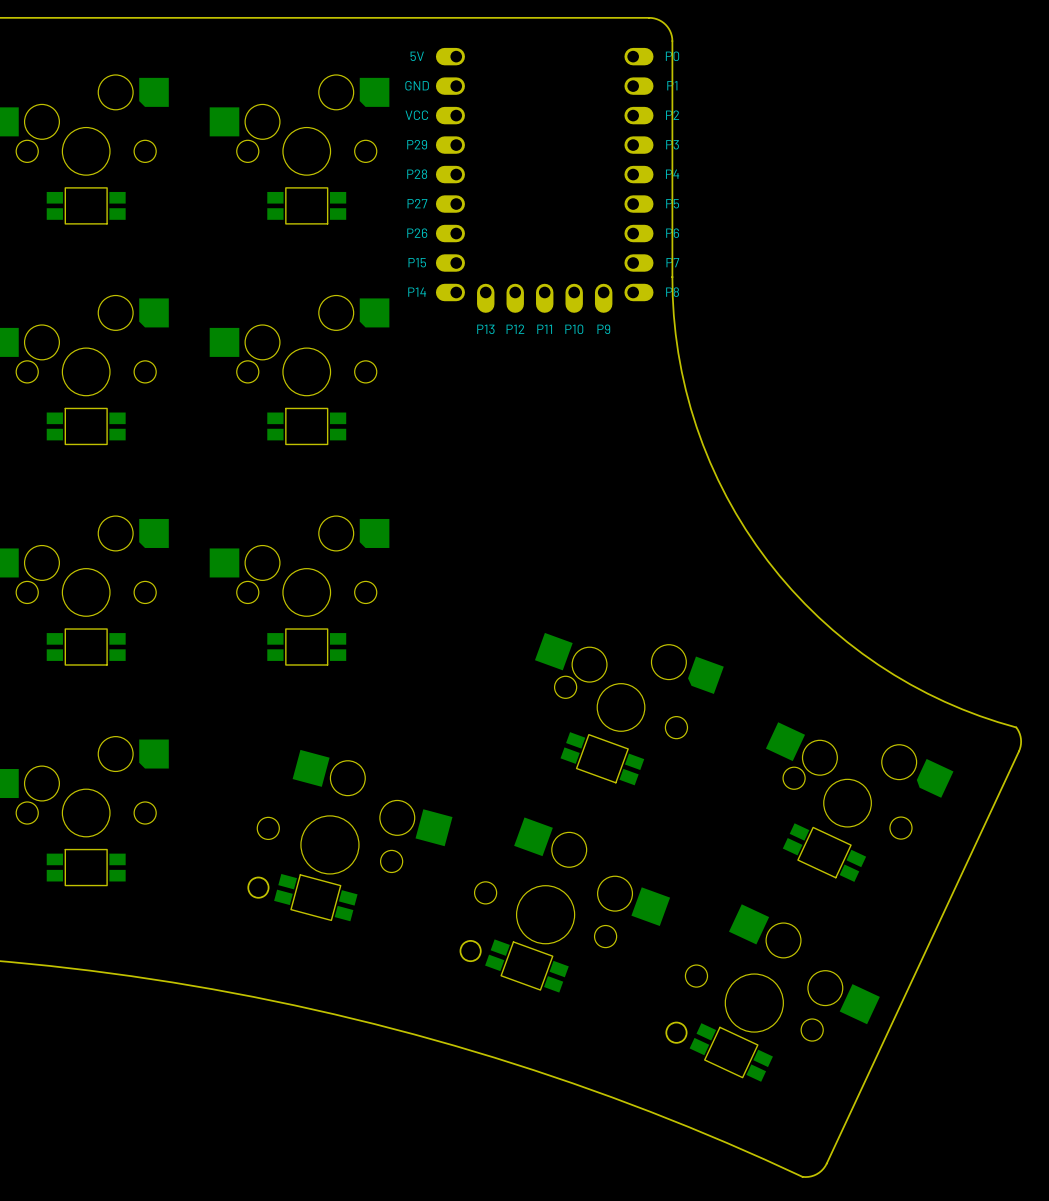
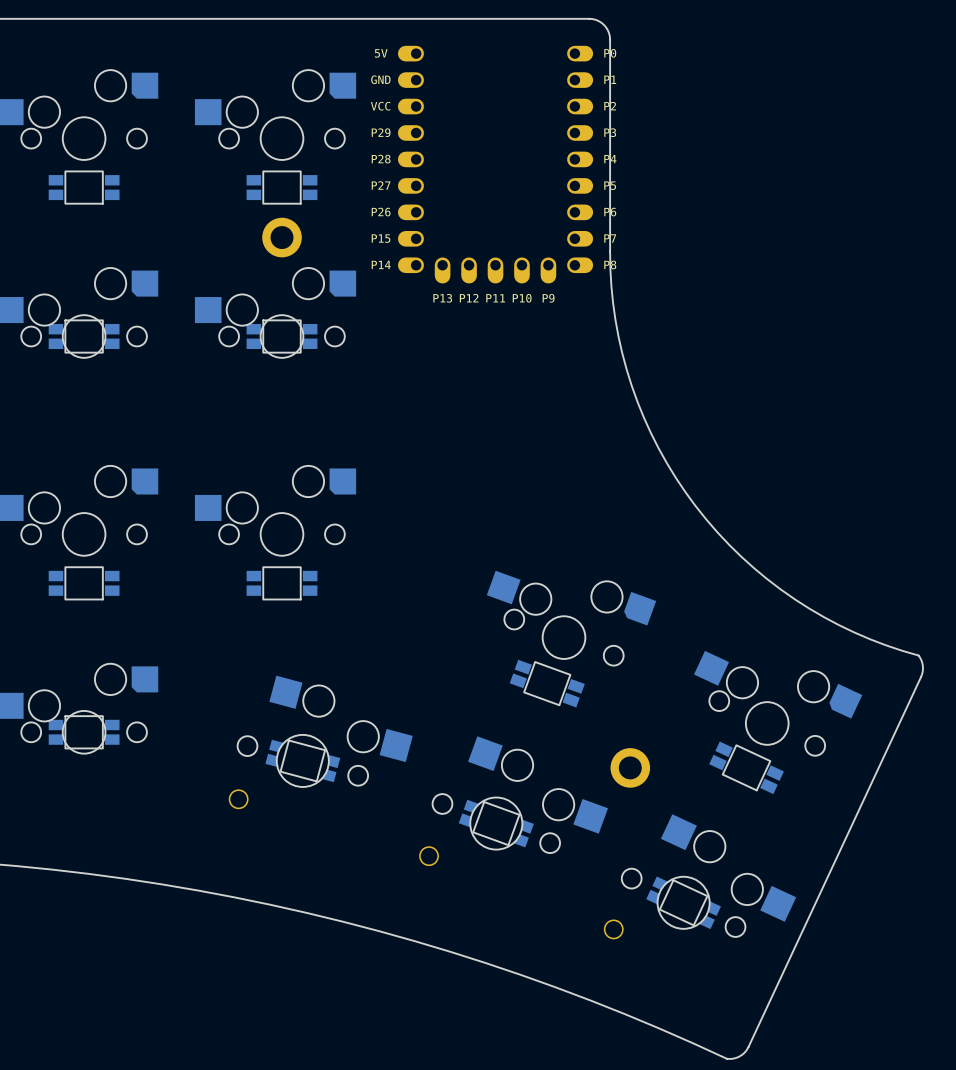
part: none -> (282, 237)
part position: (86, 426) -> (84, 336)
part position: (306, 426) -> (282, 336)
part: none -> (630, 767)
part position: (86, 867) -> (84, 732)
part position: (315, 897) -> (302, 760)
part position: (526, 965) -> (496, 823)
part position: (731, 1052) -> (683, 902)

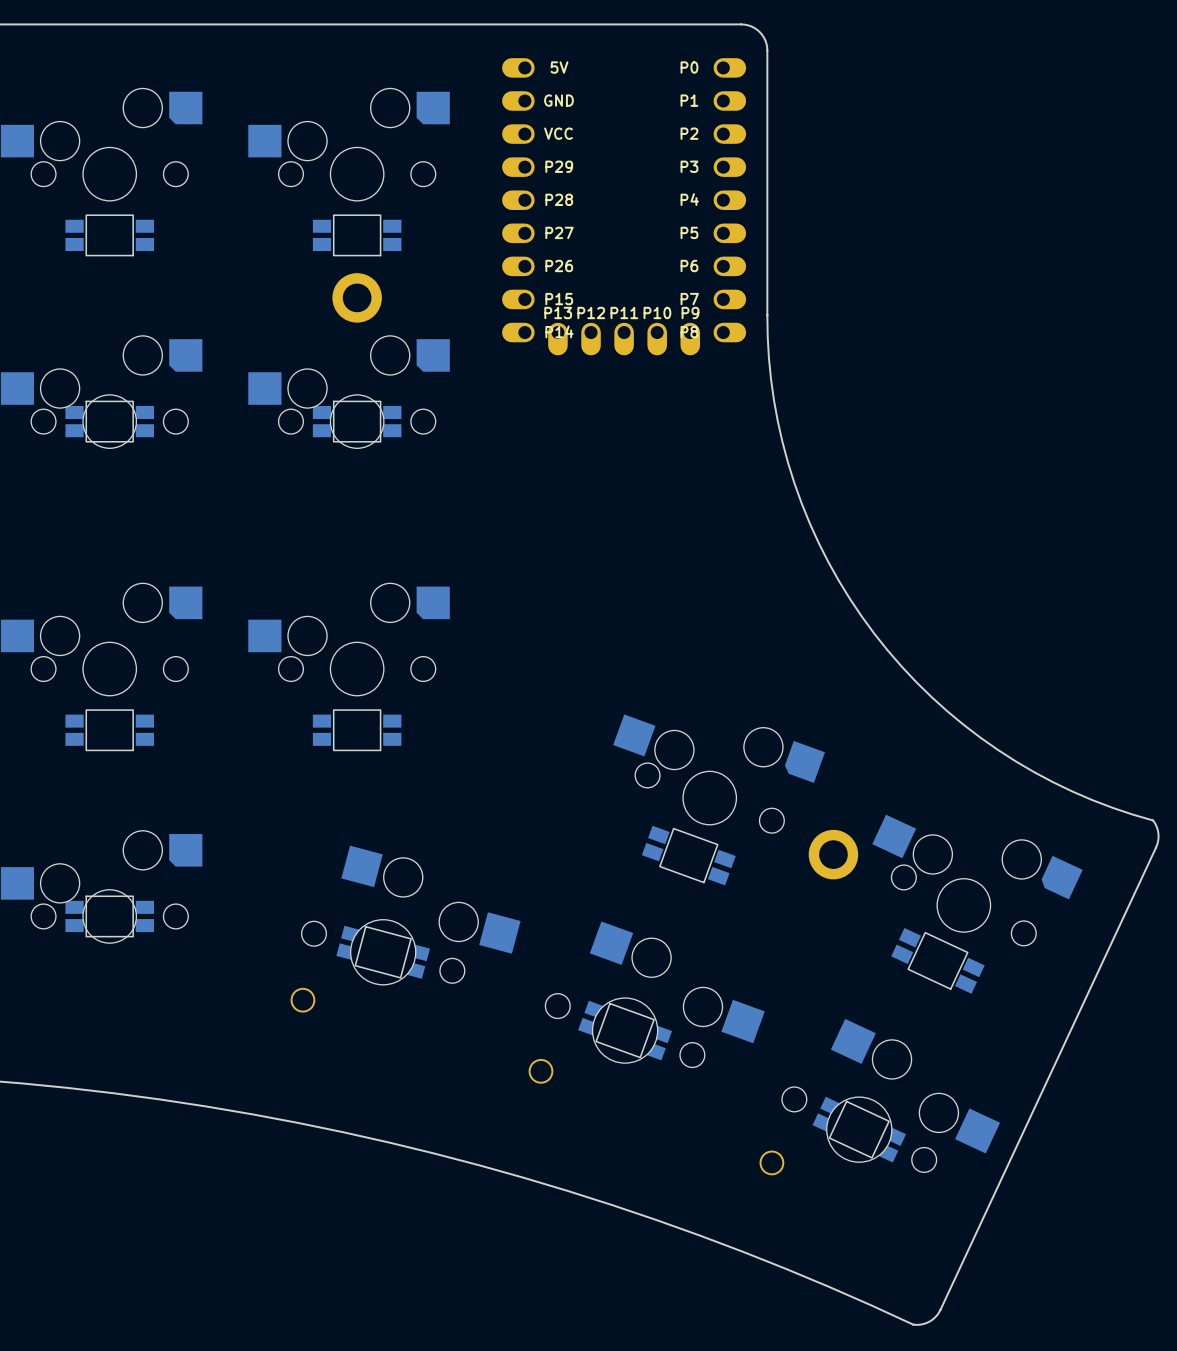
part footprint: [397, 45, 594, 284] -> [502, 58, 747, 356]
part position: (630, 767) -> (833, 854)

